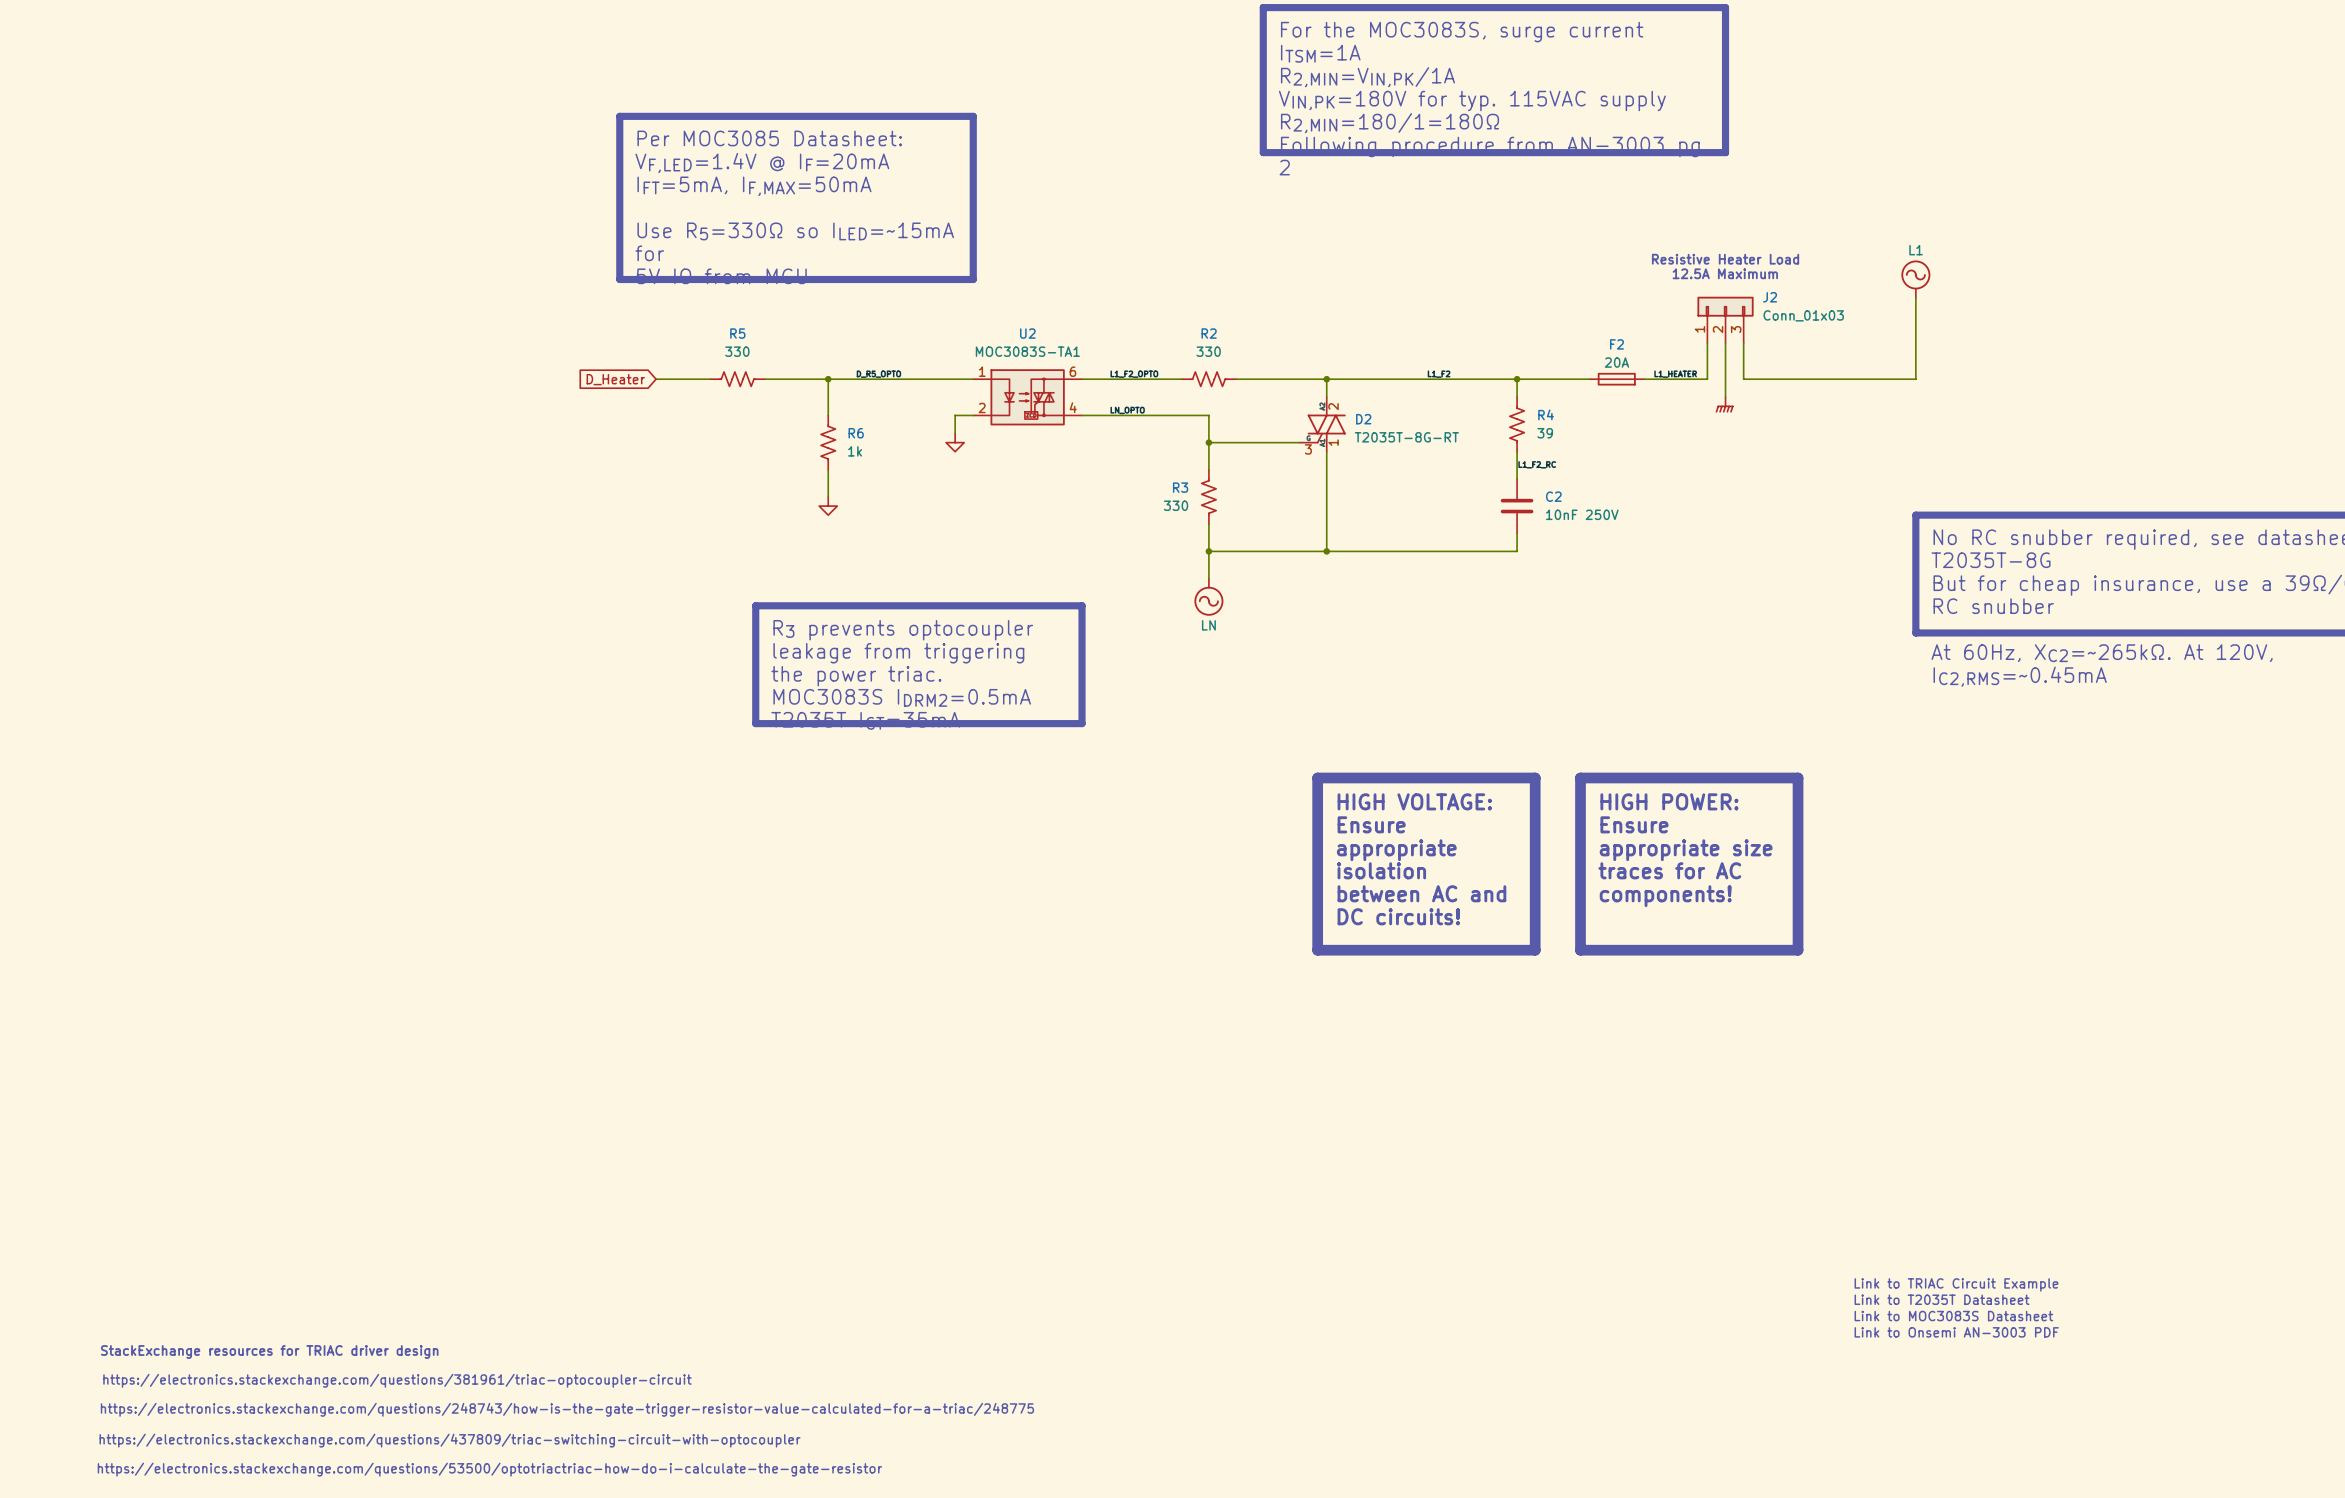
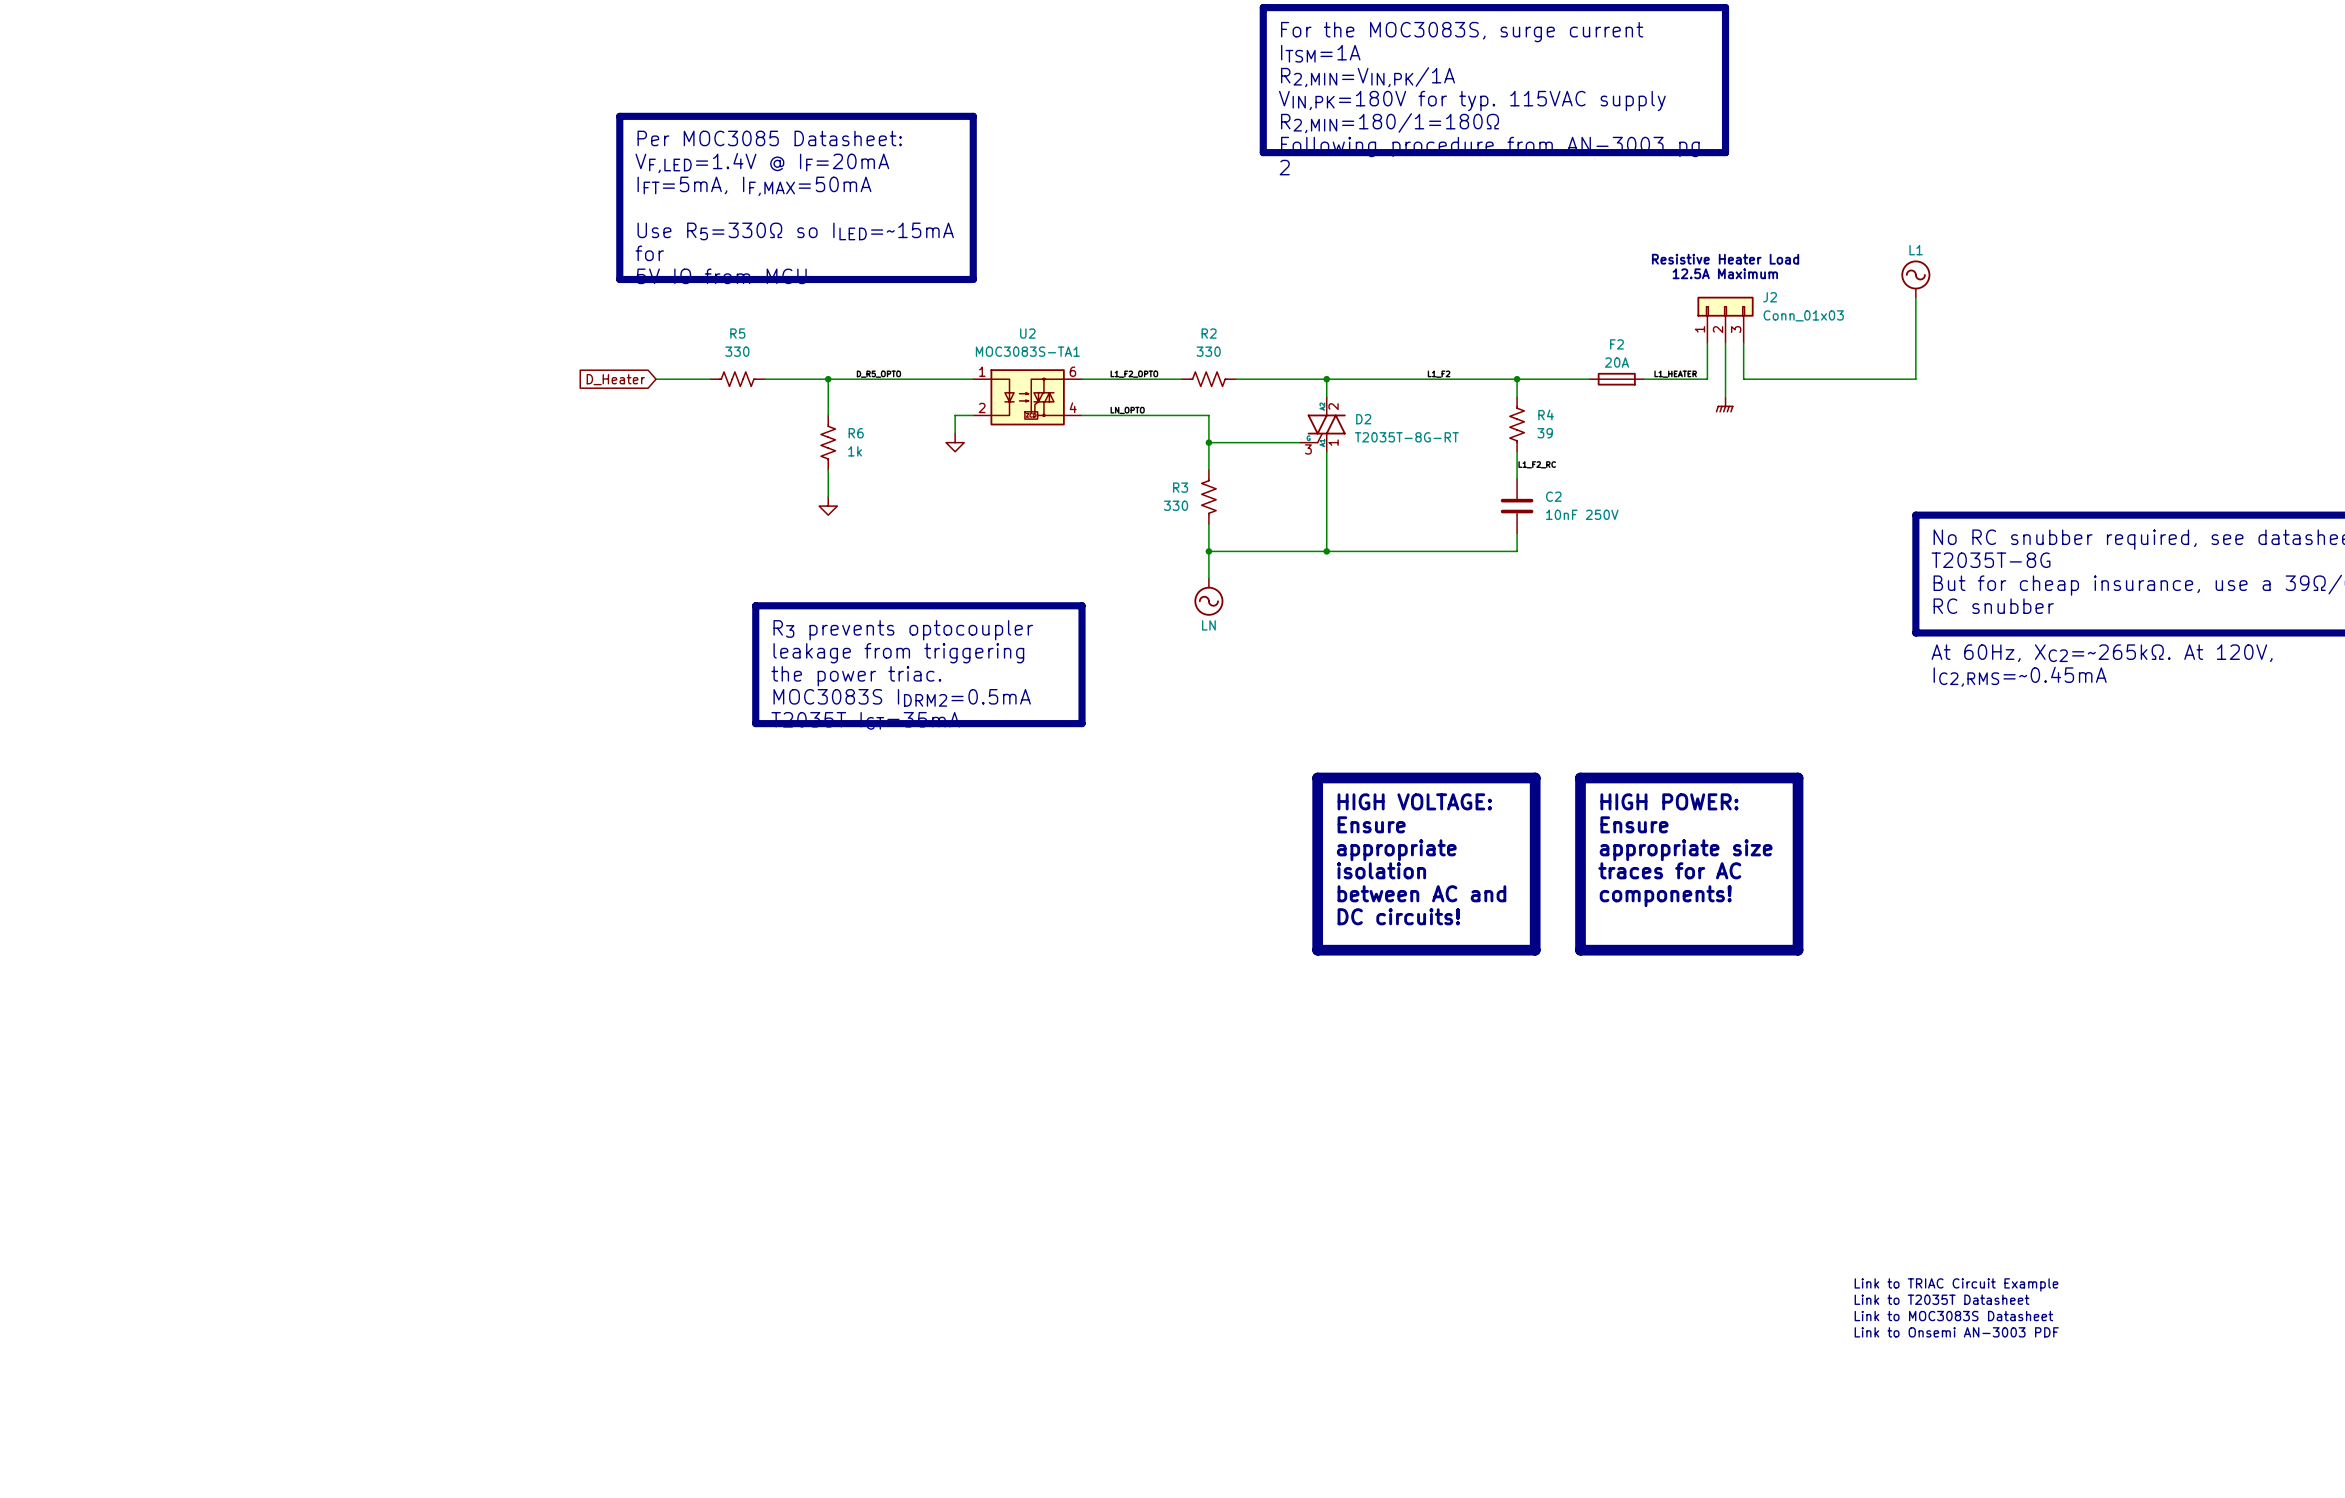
text: StackExchange resources for TRIAC driver design (269, 1352) -> none
text: https://electronics.stackexchange.com/questions/381961/triac-optocoupler-circuit (397, 1380) -> none
text: https://electronics.stackexchange.com/questions/248743/how-is-the-gate-trigger-resistor-value-calculated-for-a-triac/248775 (567, 1409) -> none
text: https://electronics.stackexchange.com/questions/437809/triac-switching-circuit-with-optocoupler (450, 1440) -> none
text: https://electronics.stackexchange.com/questions/53500/optotriactriac-how-do-i-calculate-the-gate-resistor (489, 1469) -> none

